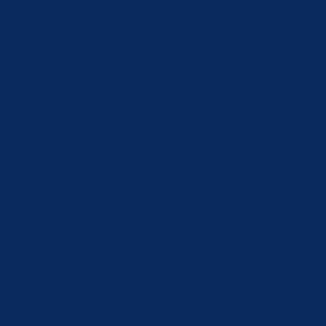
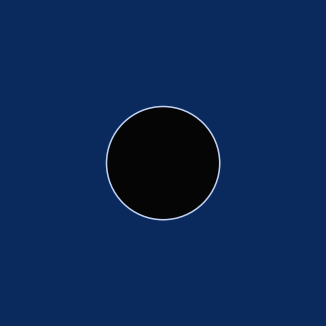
part: none -> (163, 163)

